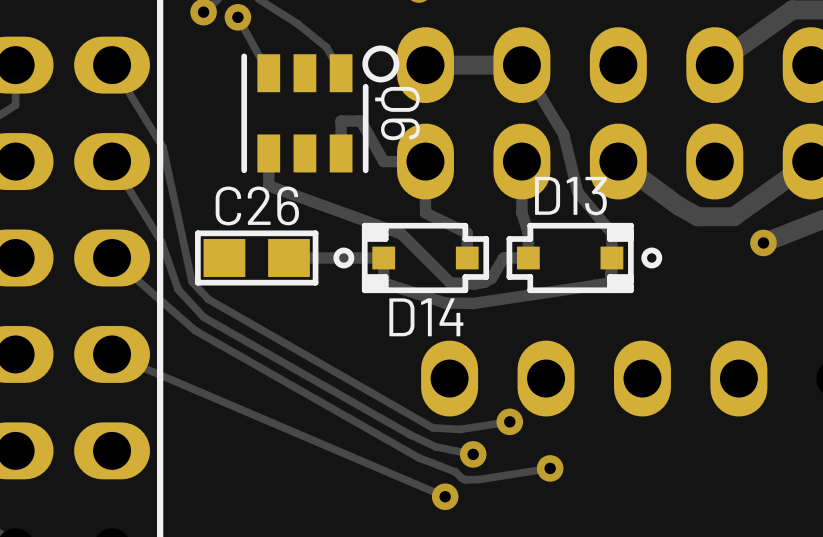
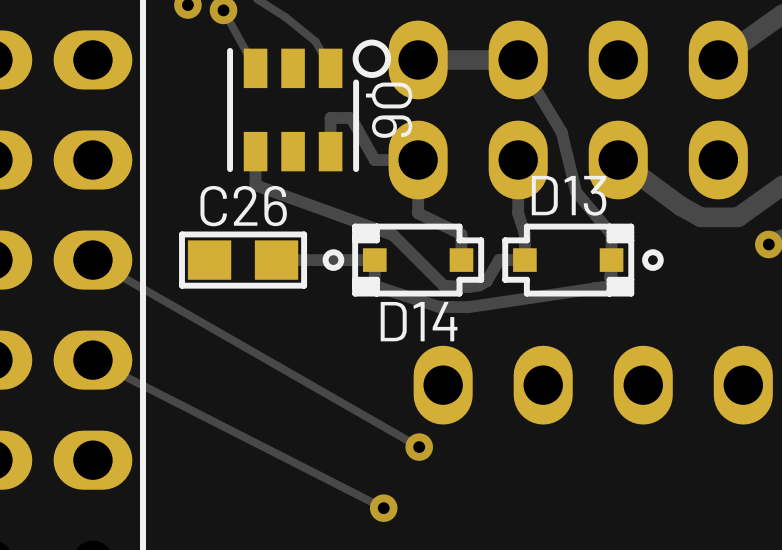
track: (112, 65) (163, 147) (192, 281) (208, 299) (432, 427) (460, 429) (509, 421) -> none
track: (112, 161) (161, 242) (178, 289) (203, 317) (409, 434) (435, 446) (473, 454) -> none
track: (112, 258) (195, 330) (418, 457) (455, 471) (465, 479) (479, 479) (550, 468) -> (92, 260) (419, 447)
track: (112, 354) (445, 496) -> (92, 360) (383, 508)
via: (509, 421) -> none
via: none -> (419, 447)
via: (473, 454) -> none
via: (550, 468) -> none
via: (445, 496) -> none
via: none -> (383, 508)

